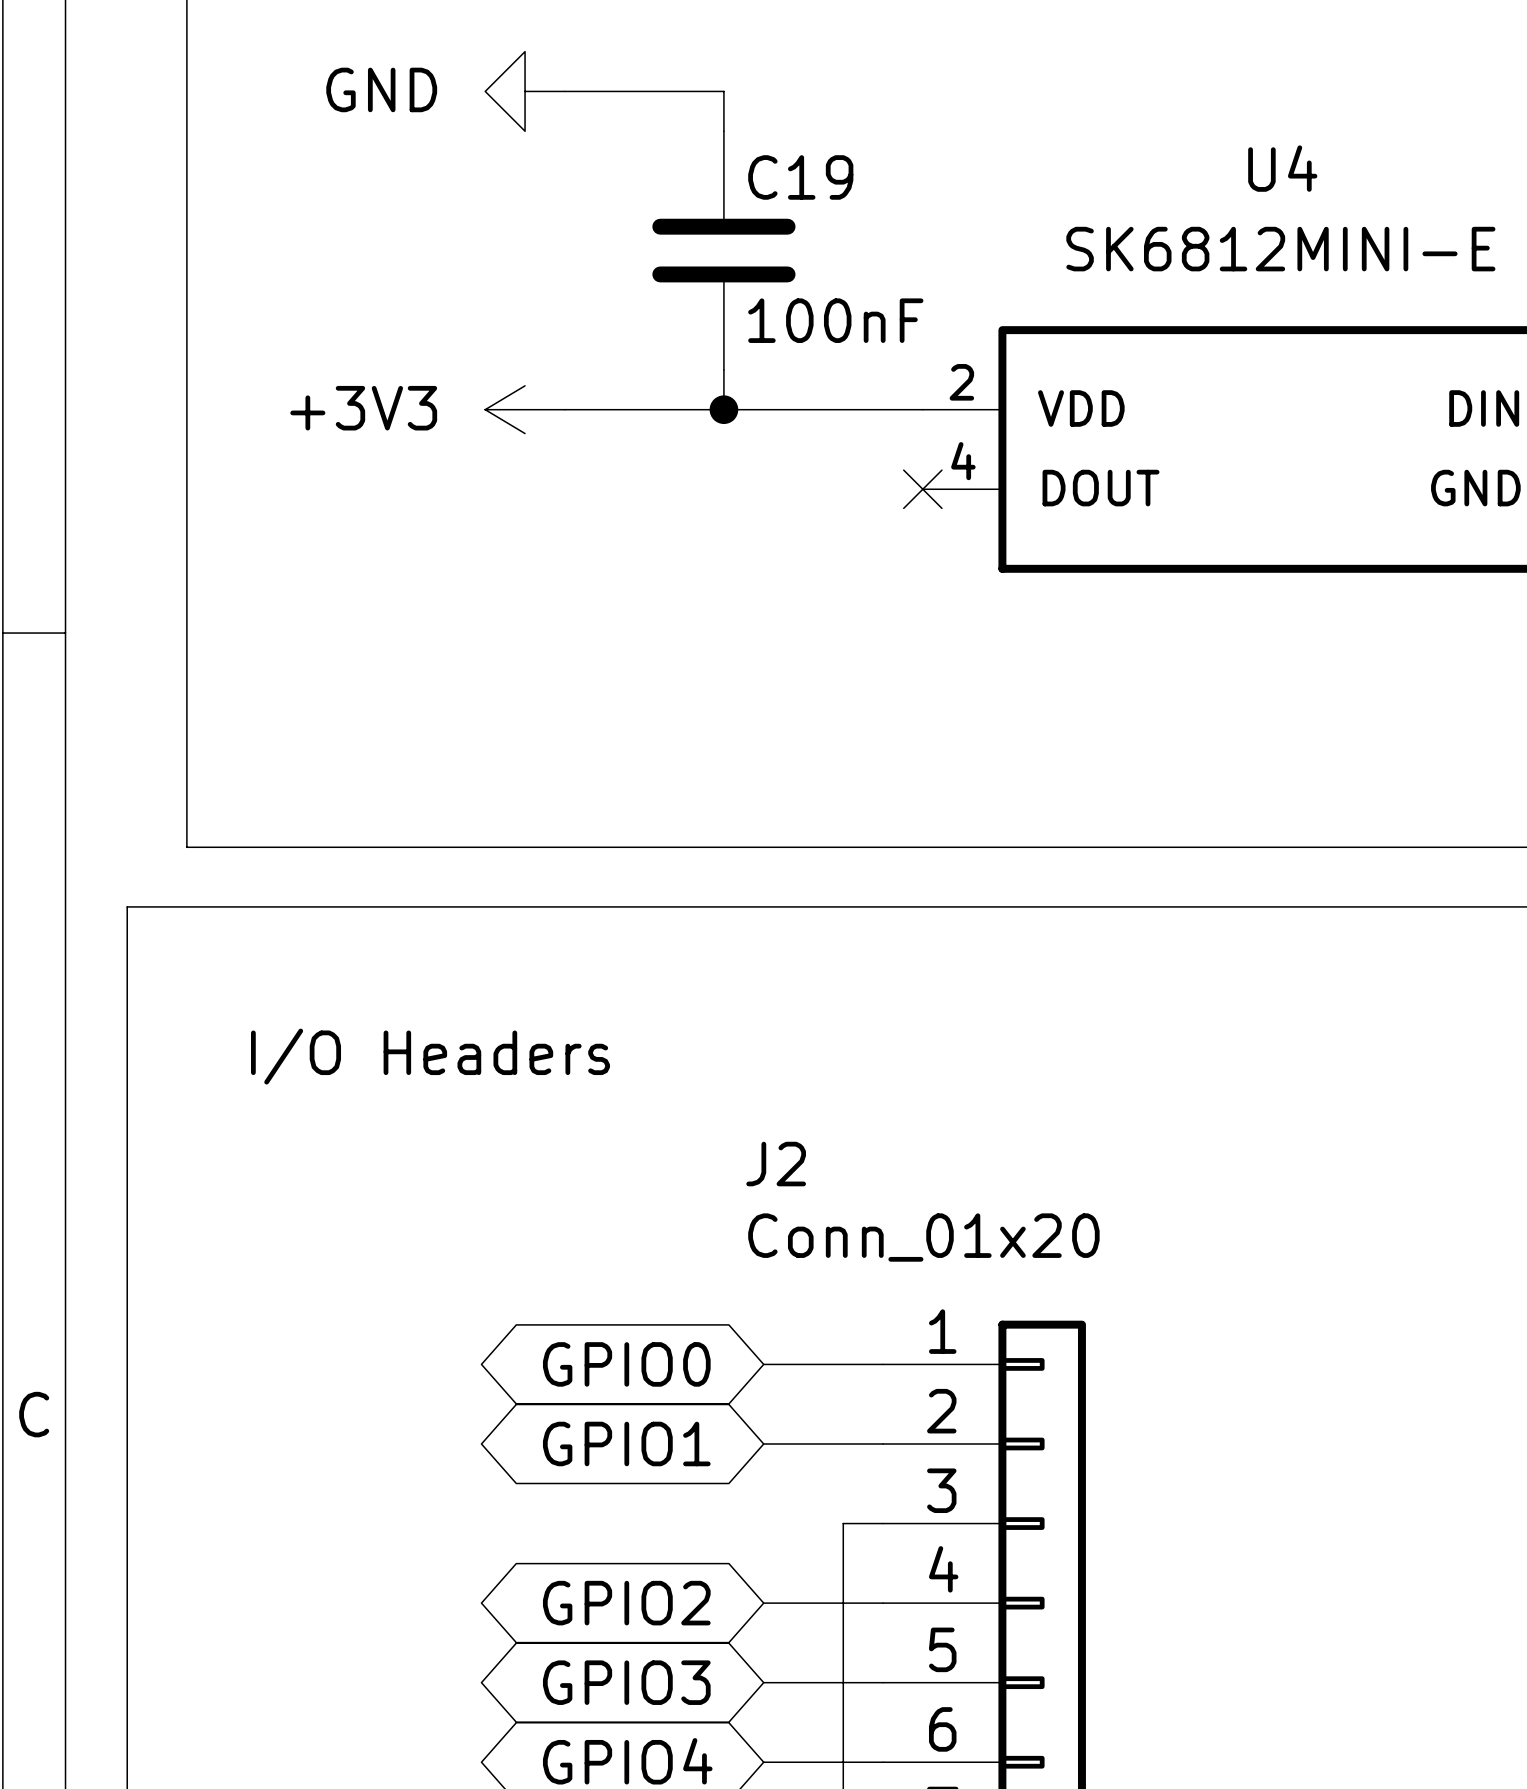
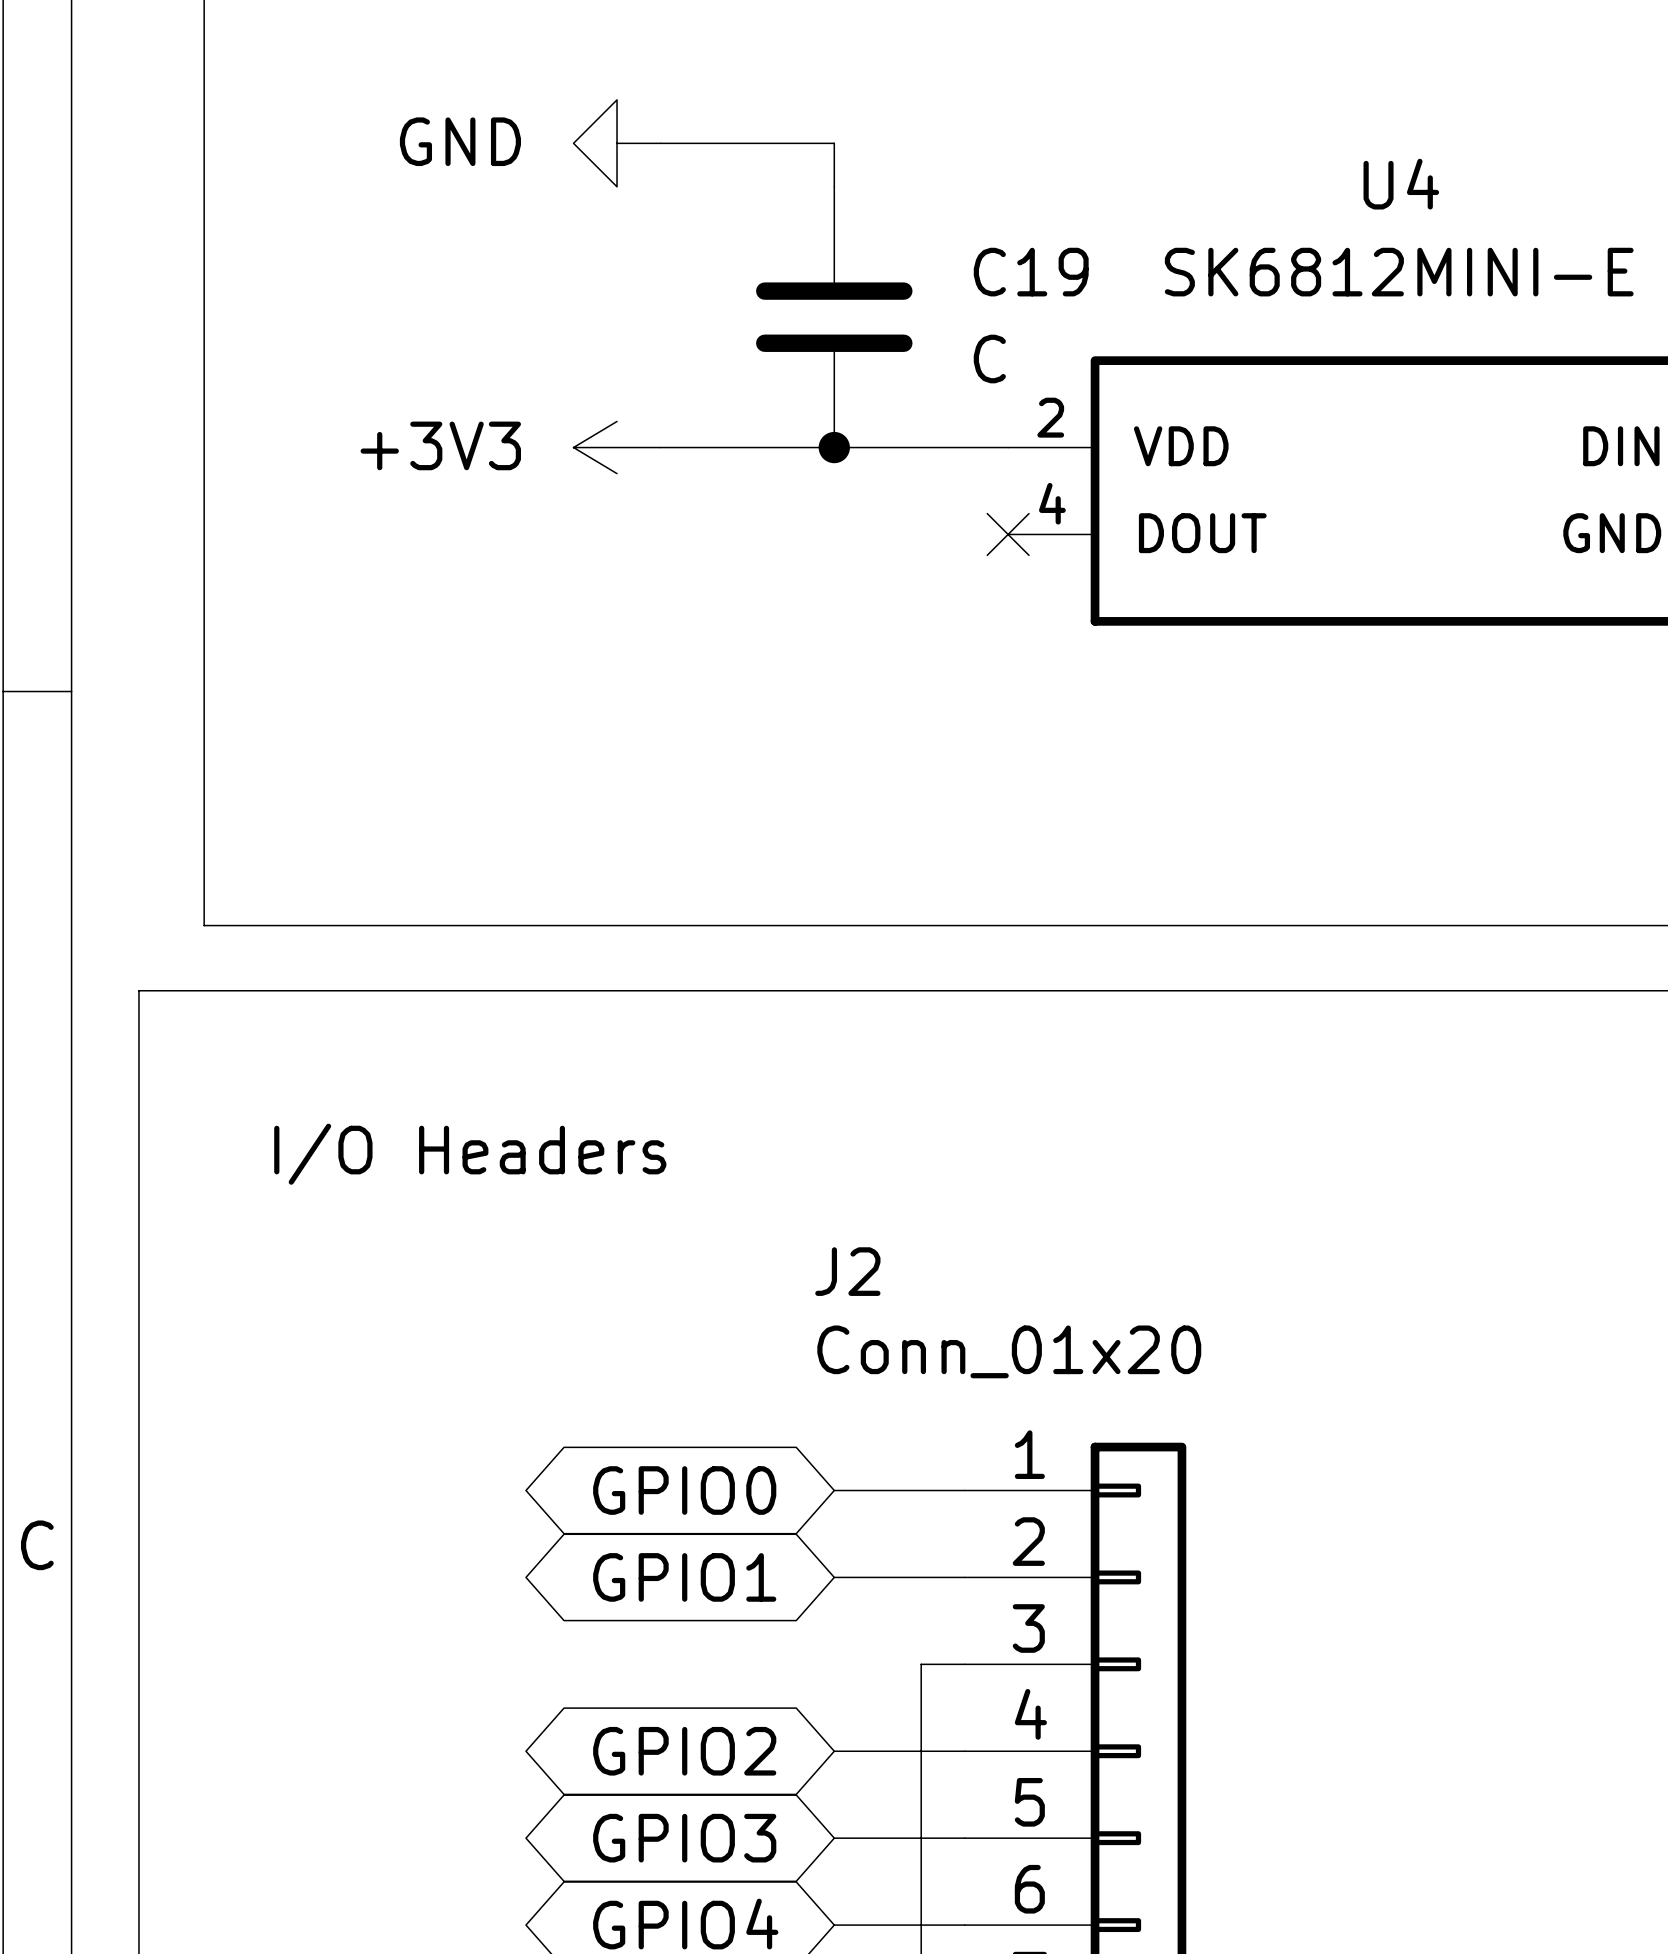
power symbol position: GND (525, 91) -> GND (617, 143)
wire: (564, 91) (723, 91) (723, 131) -> (660, 143) (834, 143) (834, 186)
C19 name position: C19 (800, 177) -> C19 (1031, 272)
C19 position: (723, 250) -> (834, 317)
C19 value: 100nF (835, 320) -> C (989, 359)
wire: (723, 369) (723, 409) -> none
power symbol position: +3V3 (525, 409) -> +3V3 (617, 447)
junction position: (723, 409) -> (834, 447)

